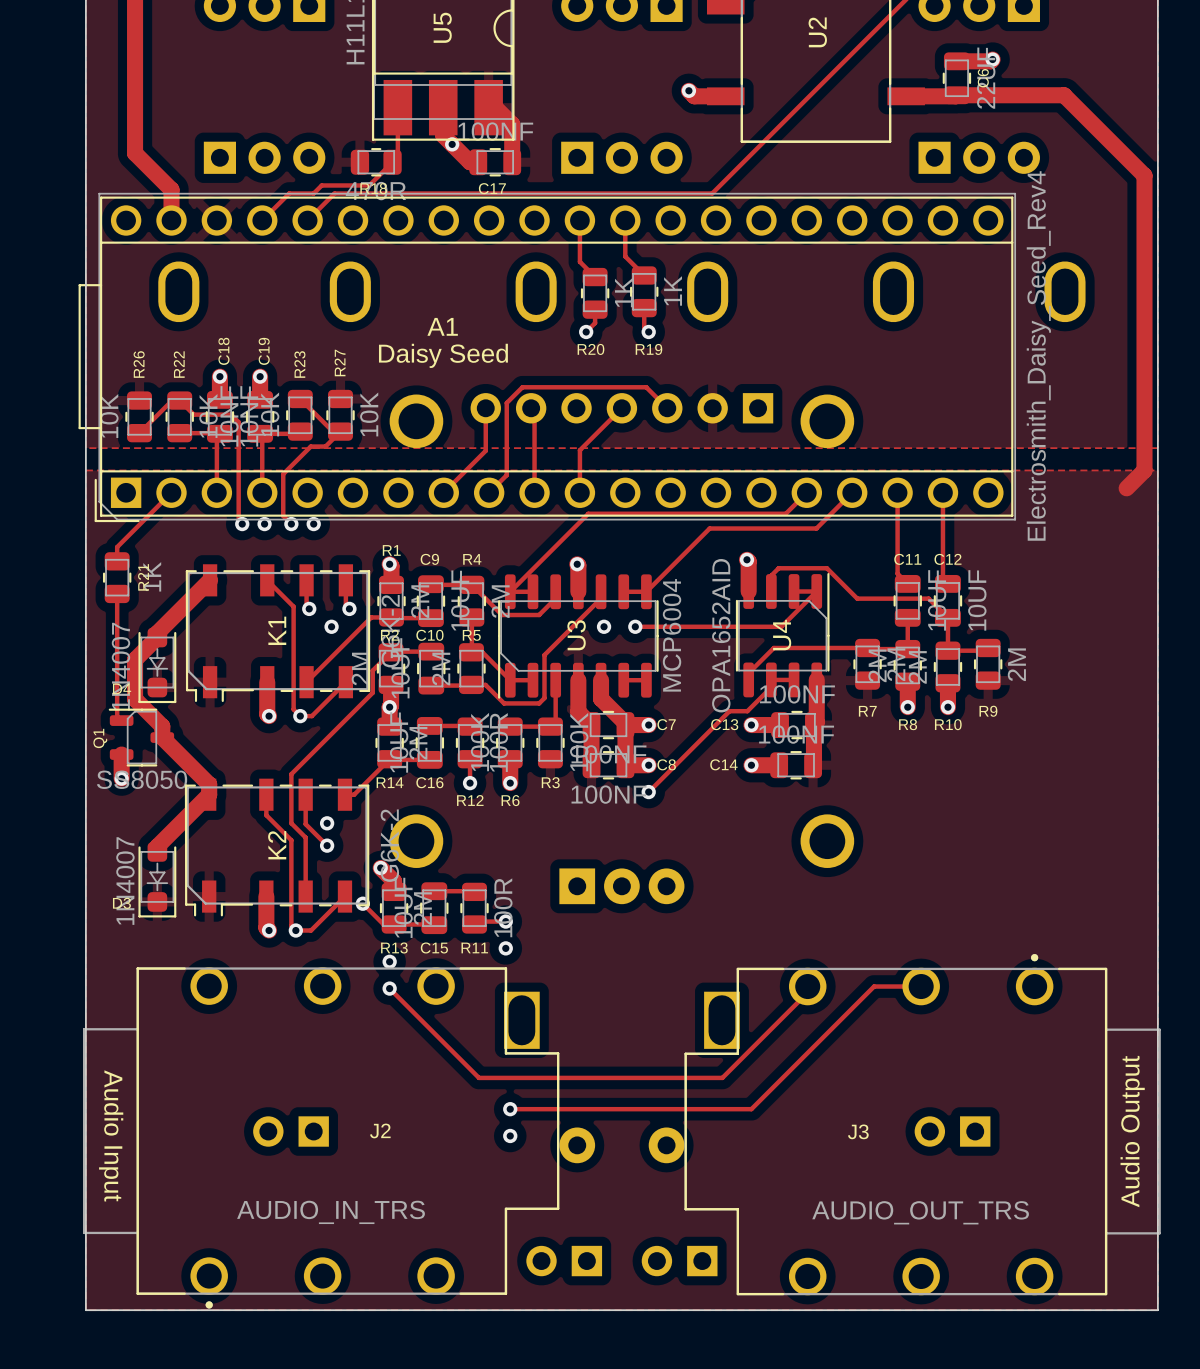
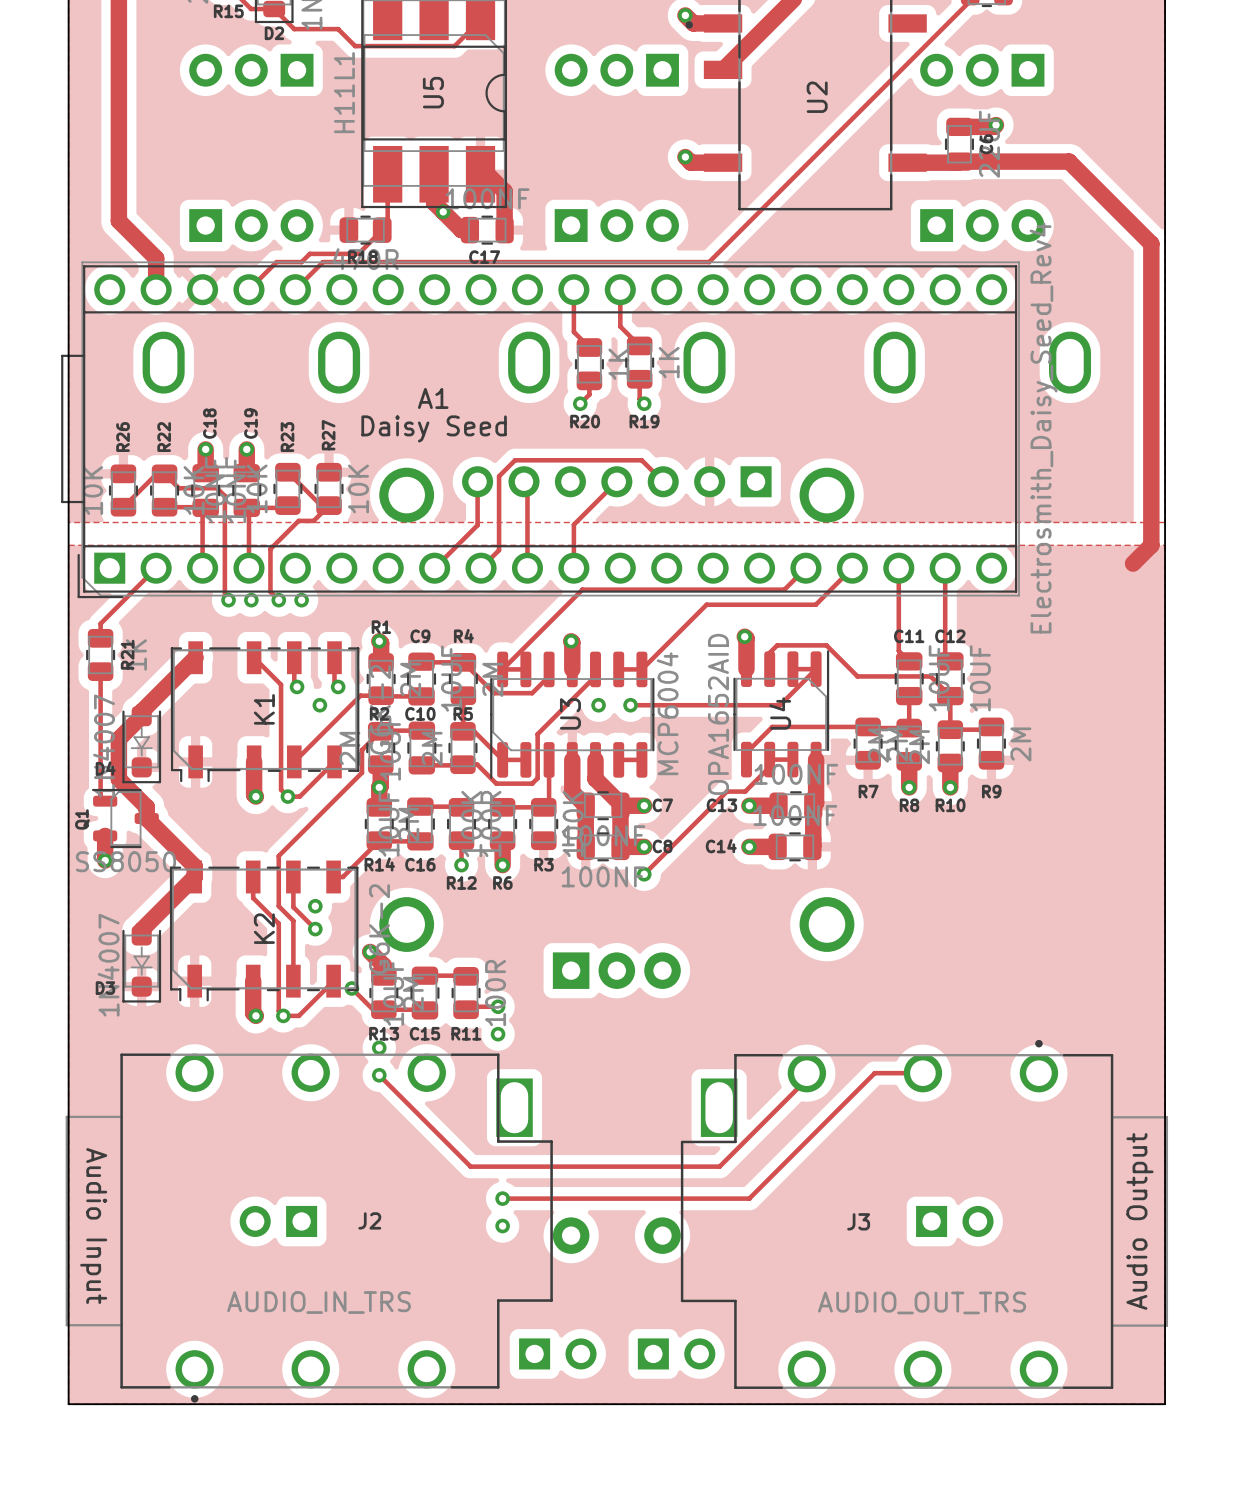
part rotation: 0° (952, 1131) -> 180° (954, 1221)
part rotation: 0° (564, 1261) -> 180° (557, 1353)
part rotation: 0° (679, 1261) -> 180° (676, 1353)

